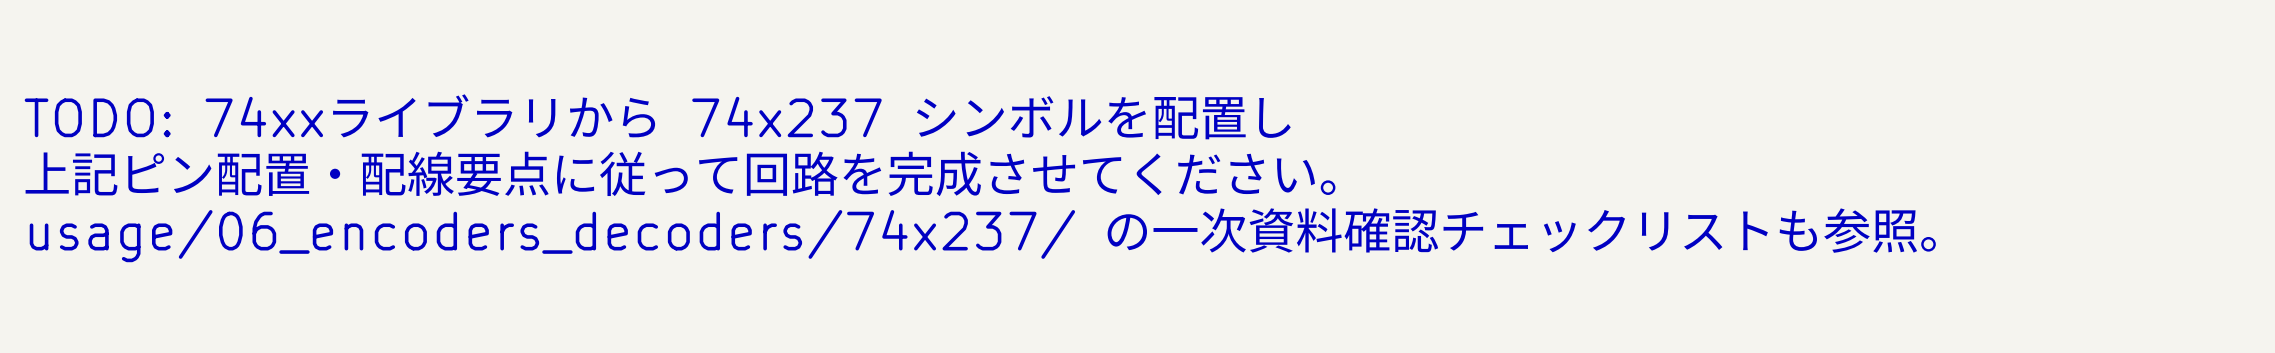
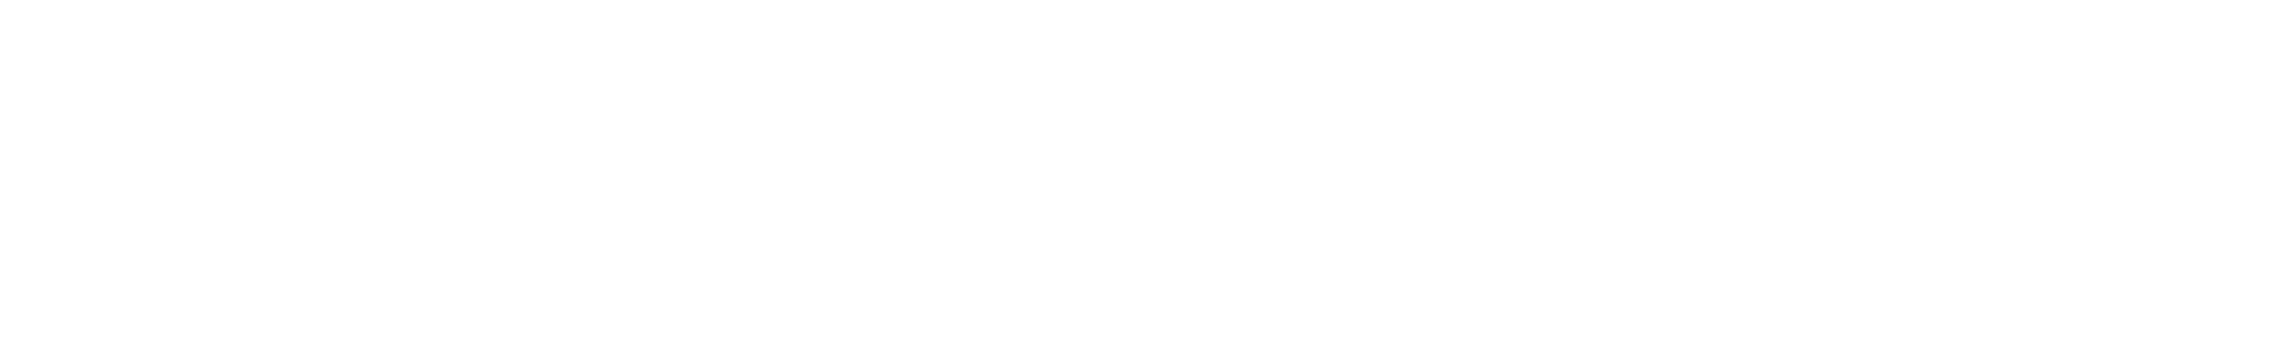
text: TODO: 74xxライブラリから 74x237 シンボルを配置し (658, 116) -> none
text: 上記ピン配置・配線要点に従って回路を完成させてください。 (680, 173) -> none
text: usage/06_encoders_decoders/74x237/ の一次資料確認チェックリストも参照。 (983, 234) -> none

